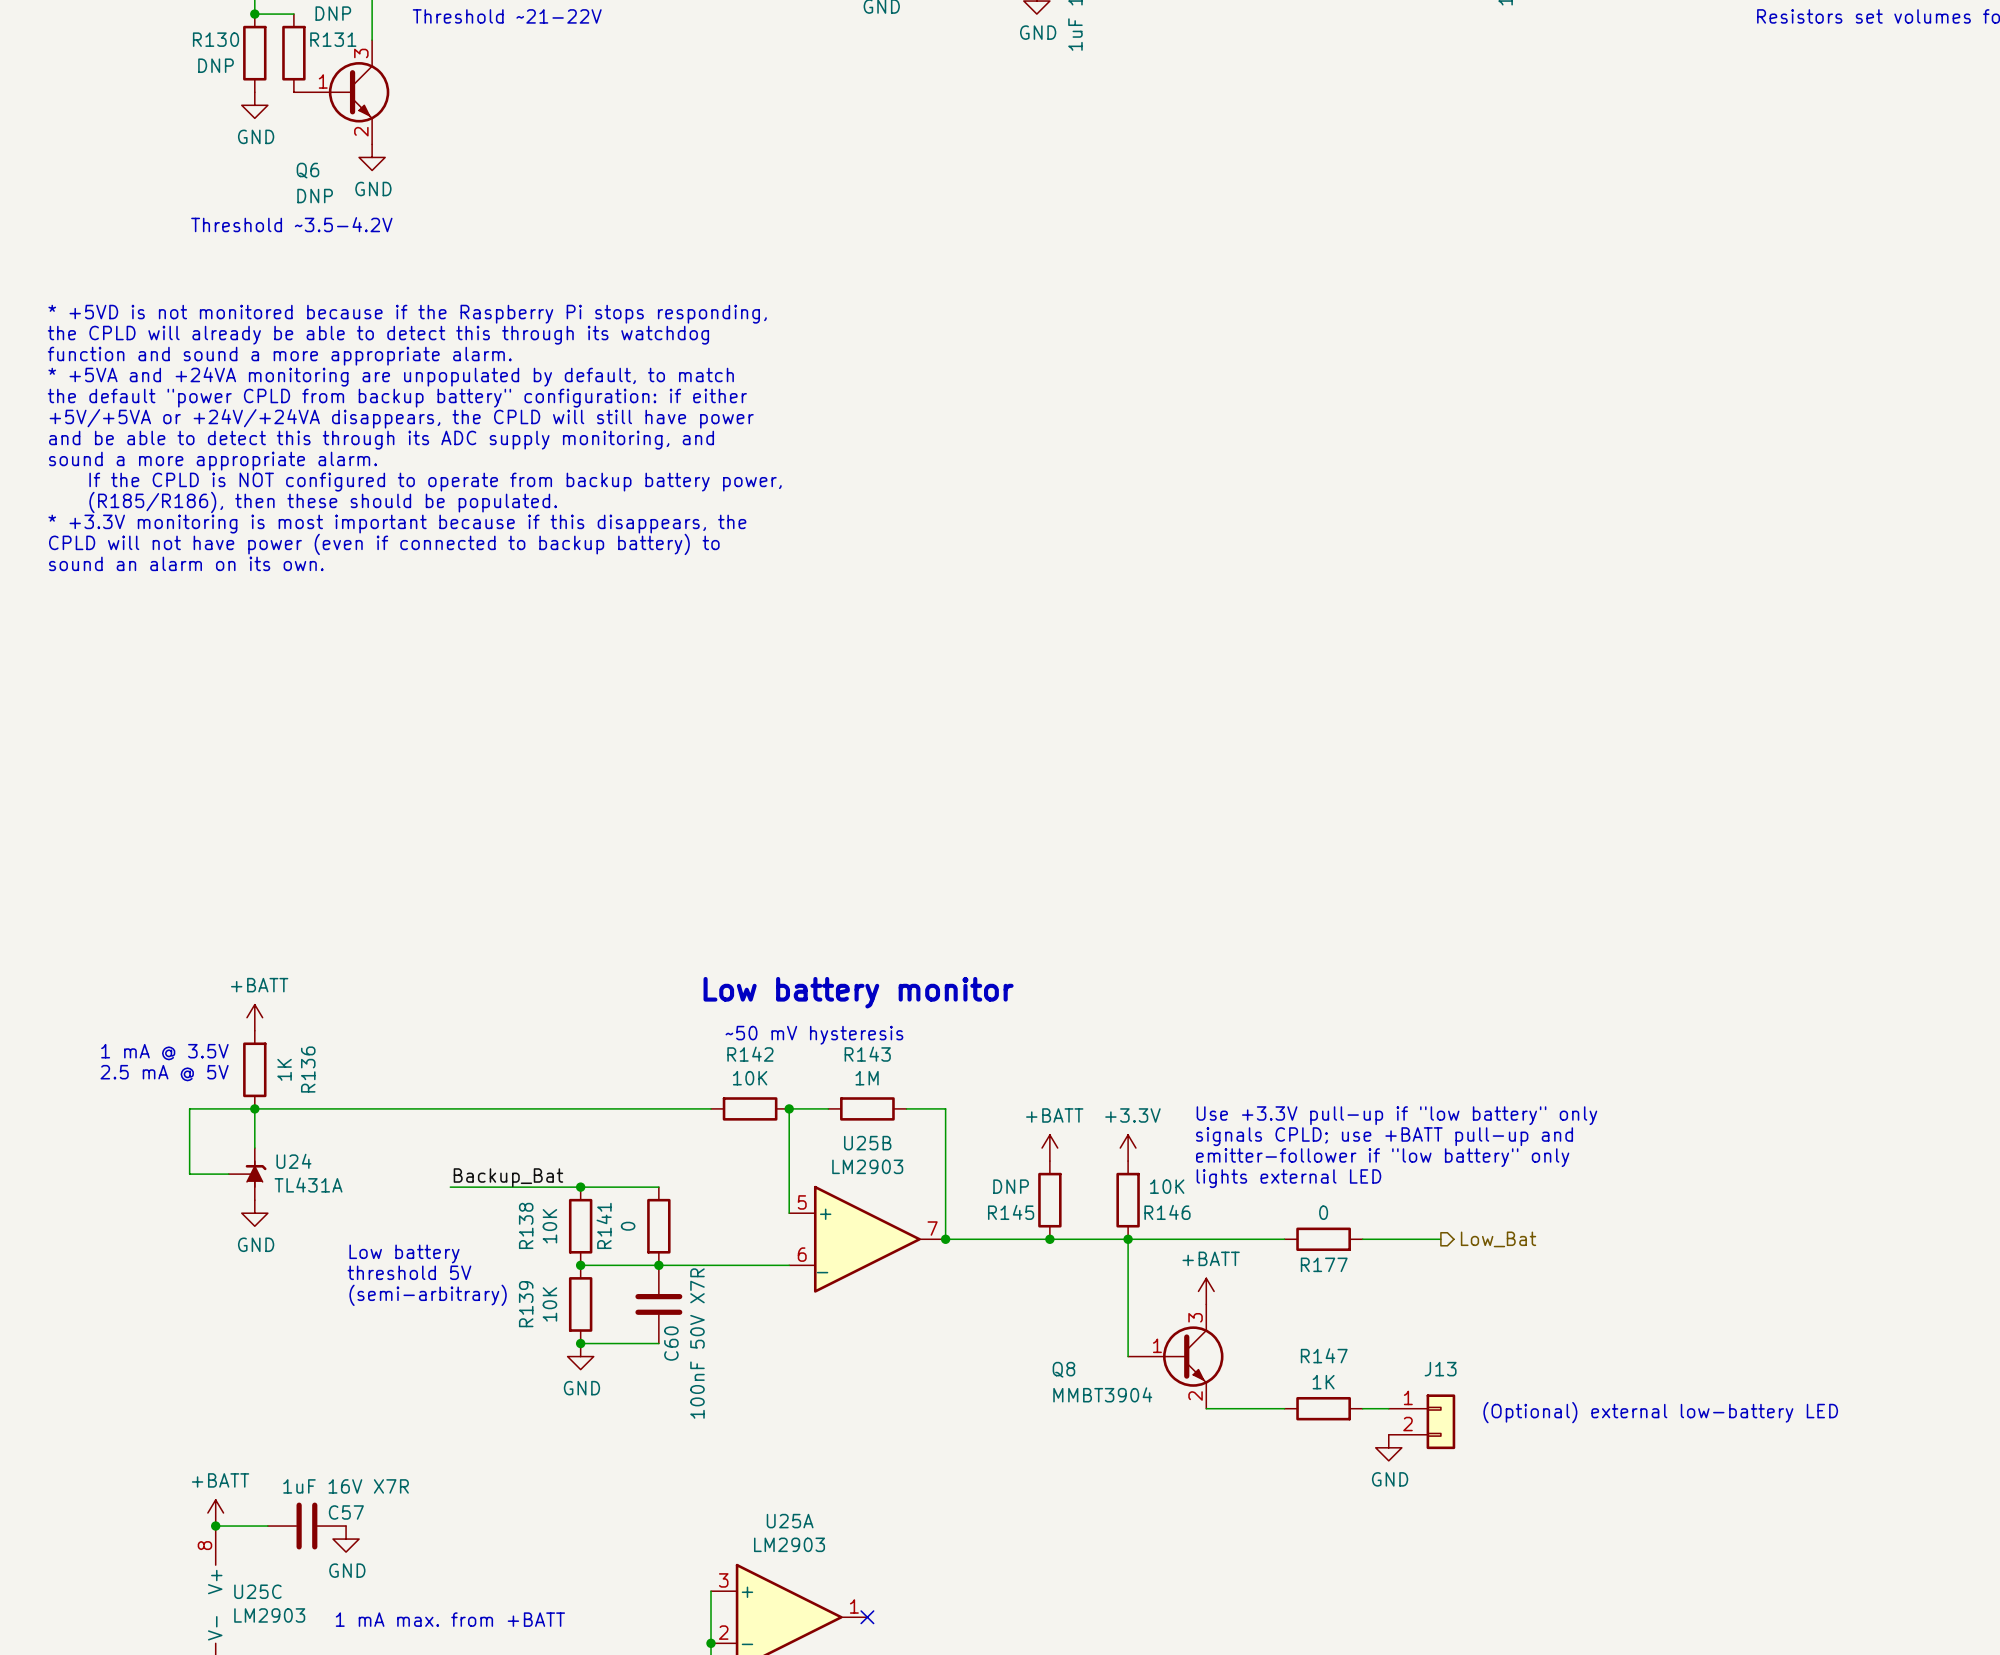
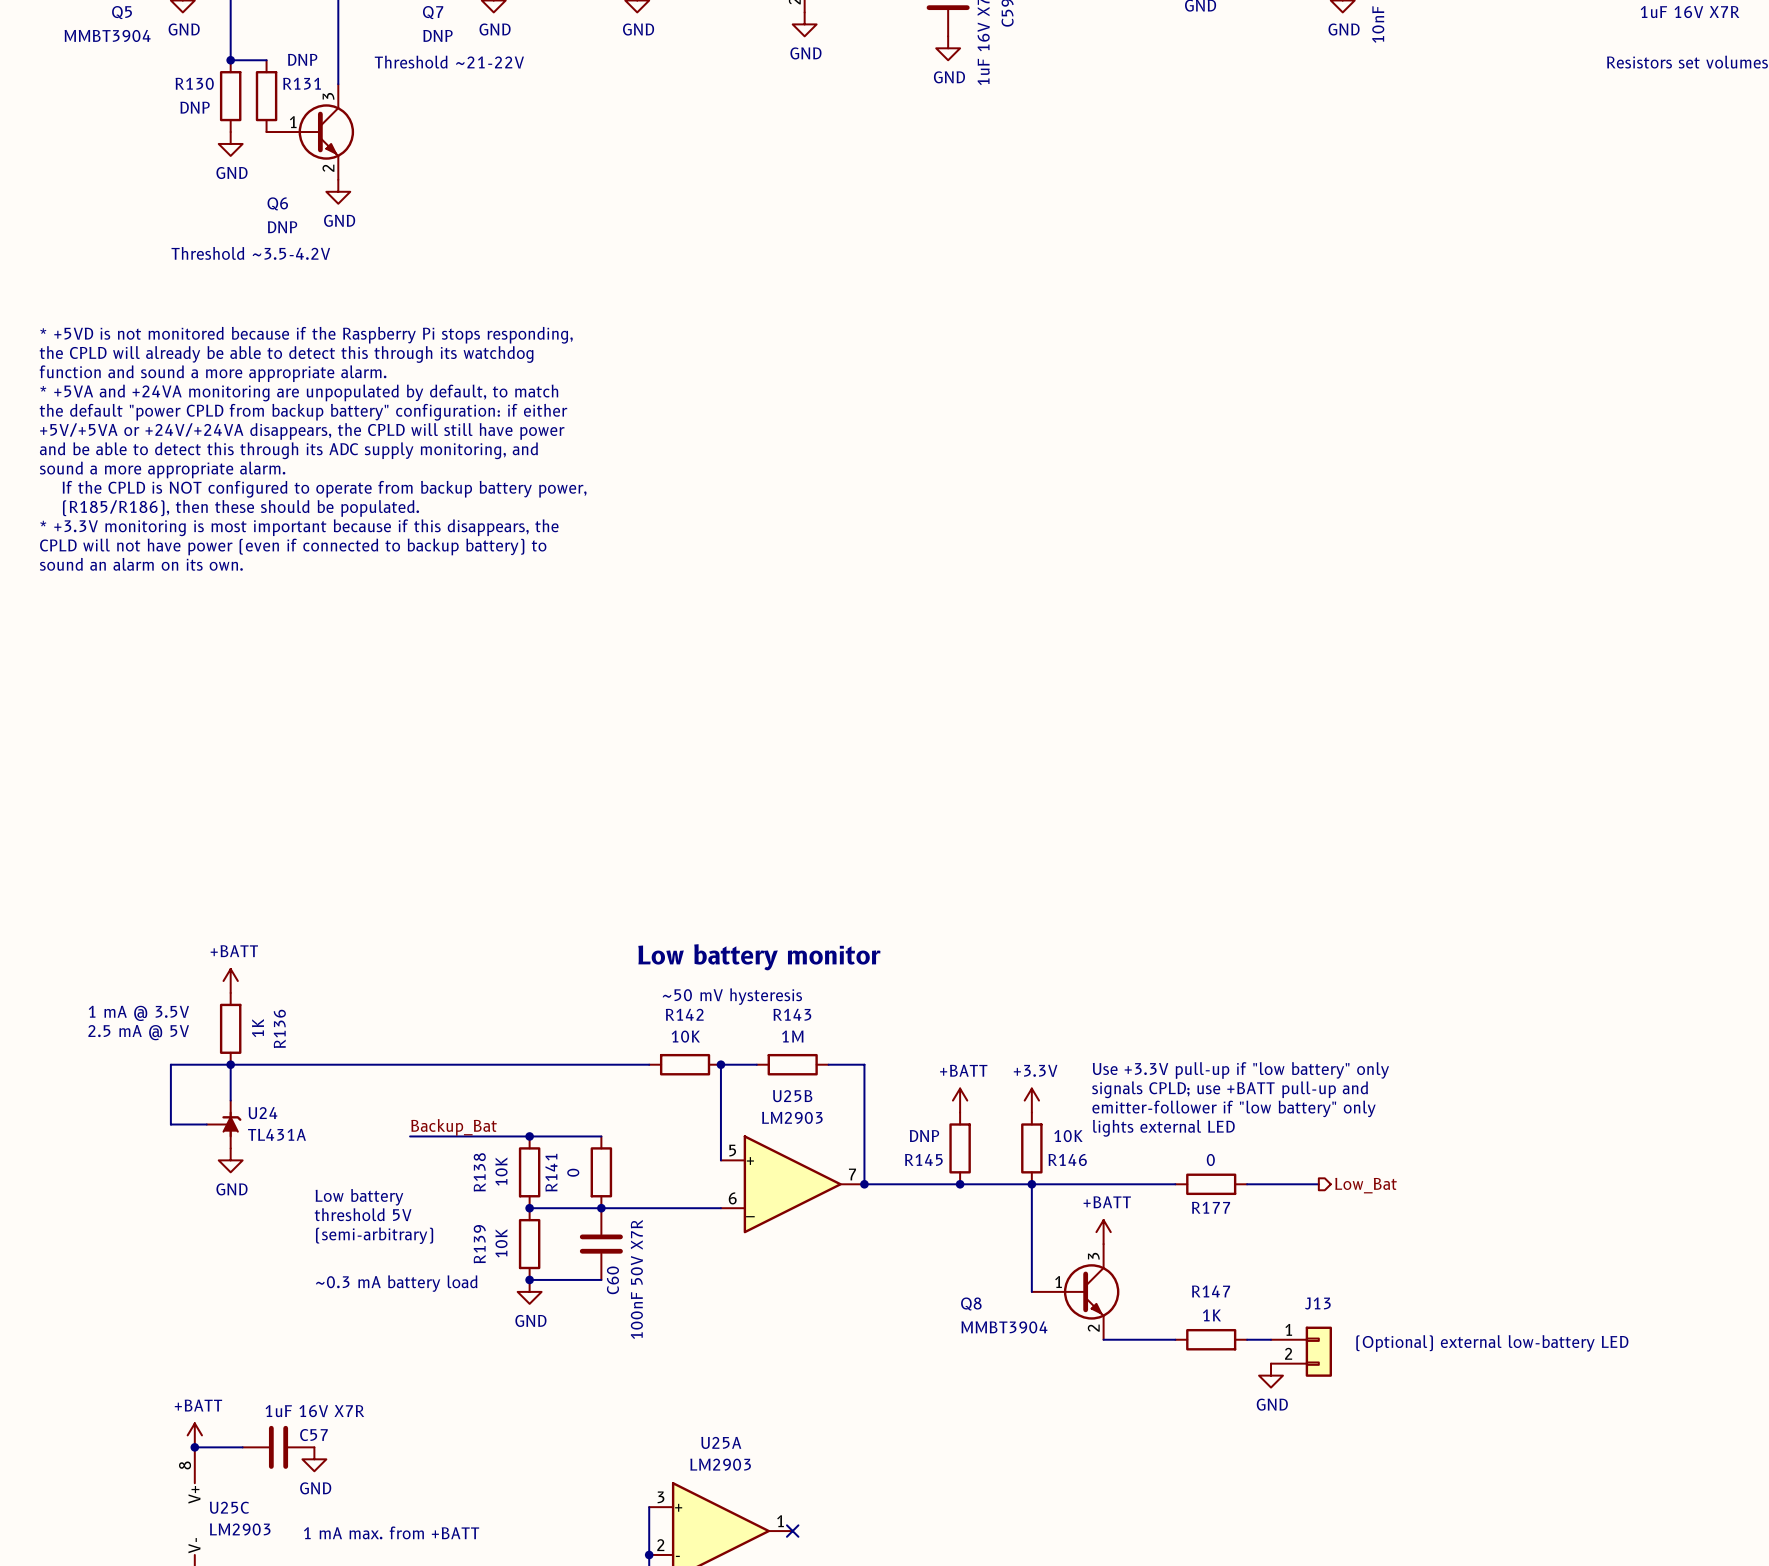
text: none -> ~0.3 mA battery load (396, 1283)

